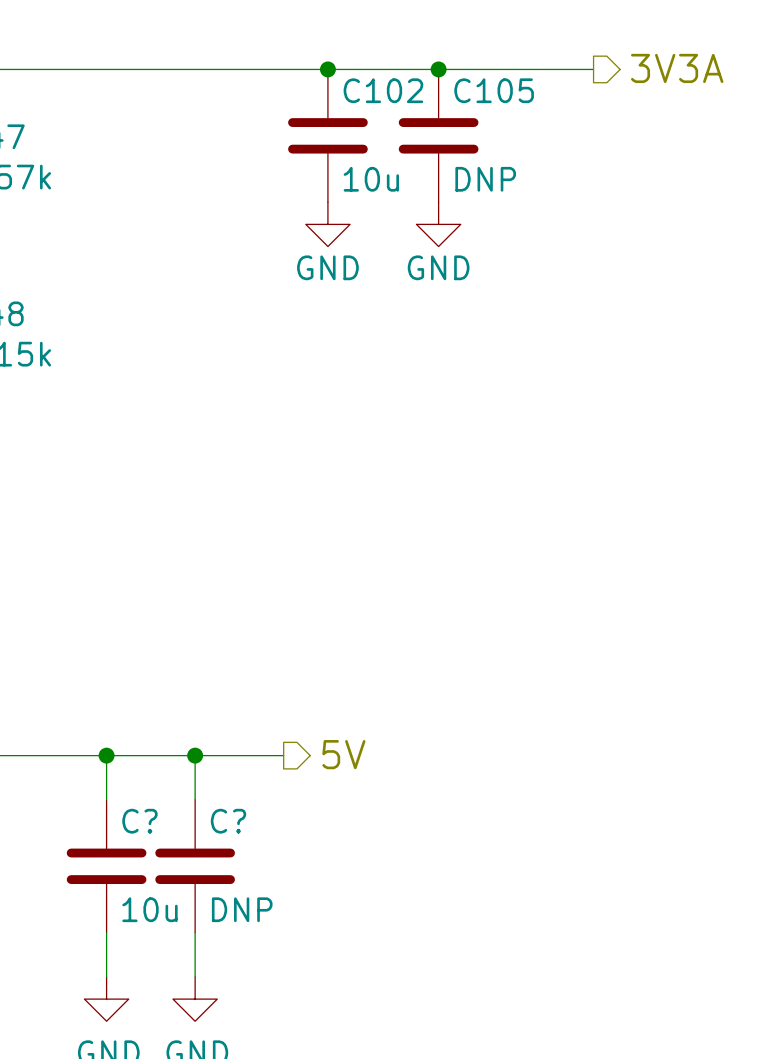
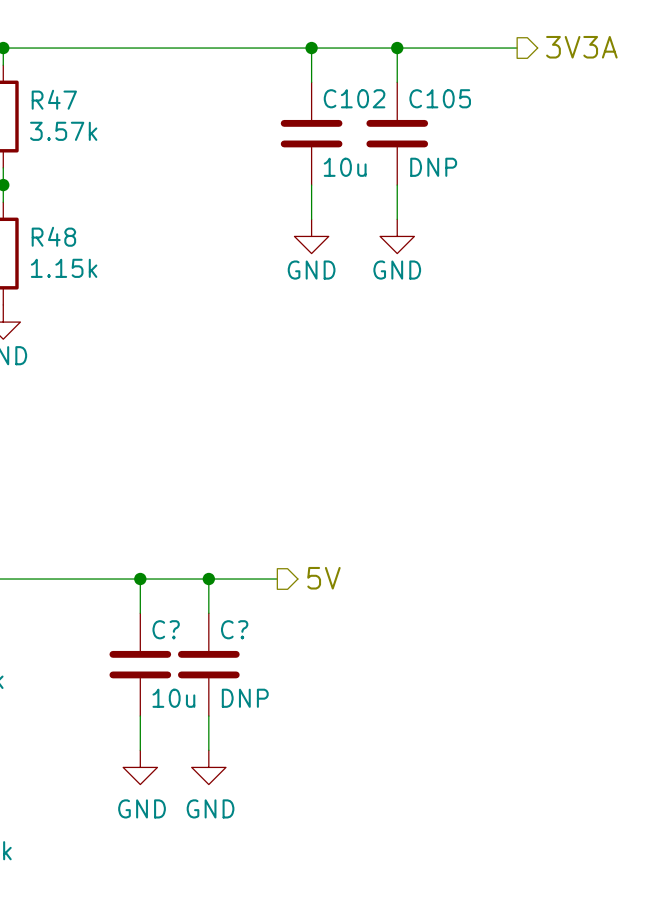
C102 position: (327, 135) -> (311, 133)
C105 position: (438, 135) -> (397, 133)
power symbol: GND (327, 224) -> none
power symbol: GND (438, 224) -> none
wire: none -> (311, 185) (311, 219)
wire: none -> (397, 185) (397, 219)
power symbol: none -> GND (311, 236)
power symbol: none -> GND (397, 236)

